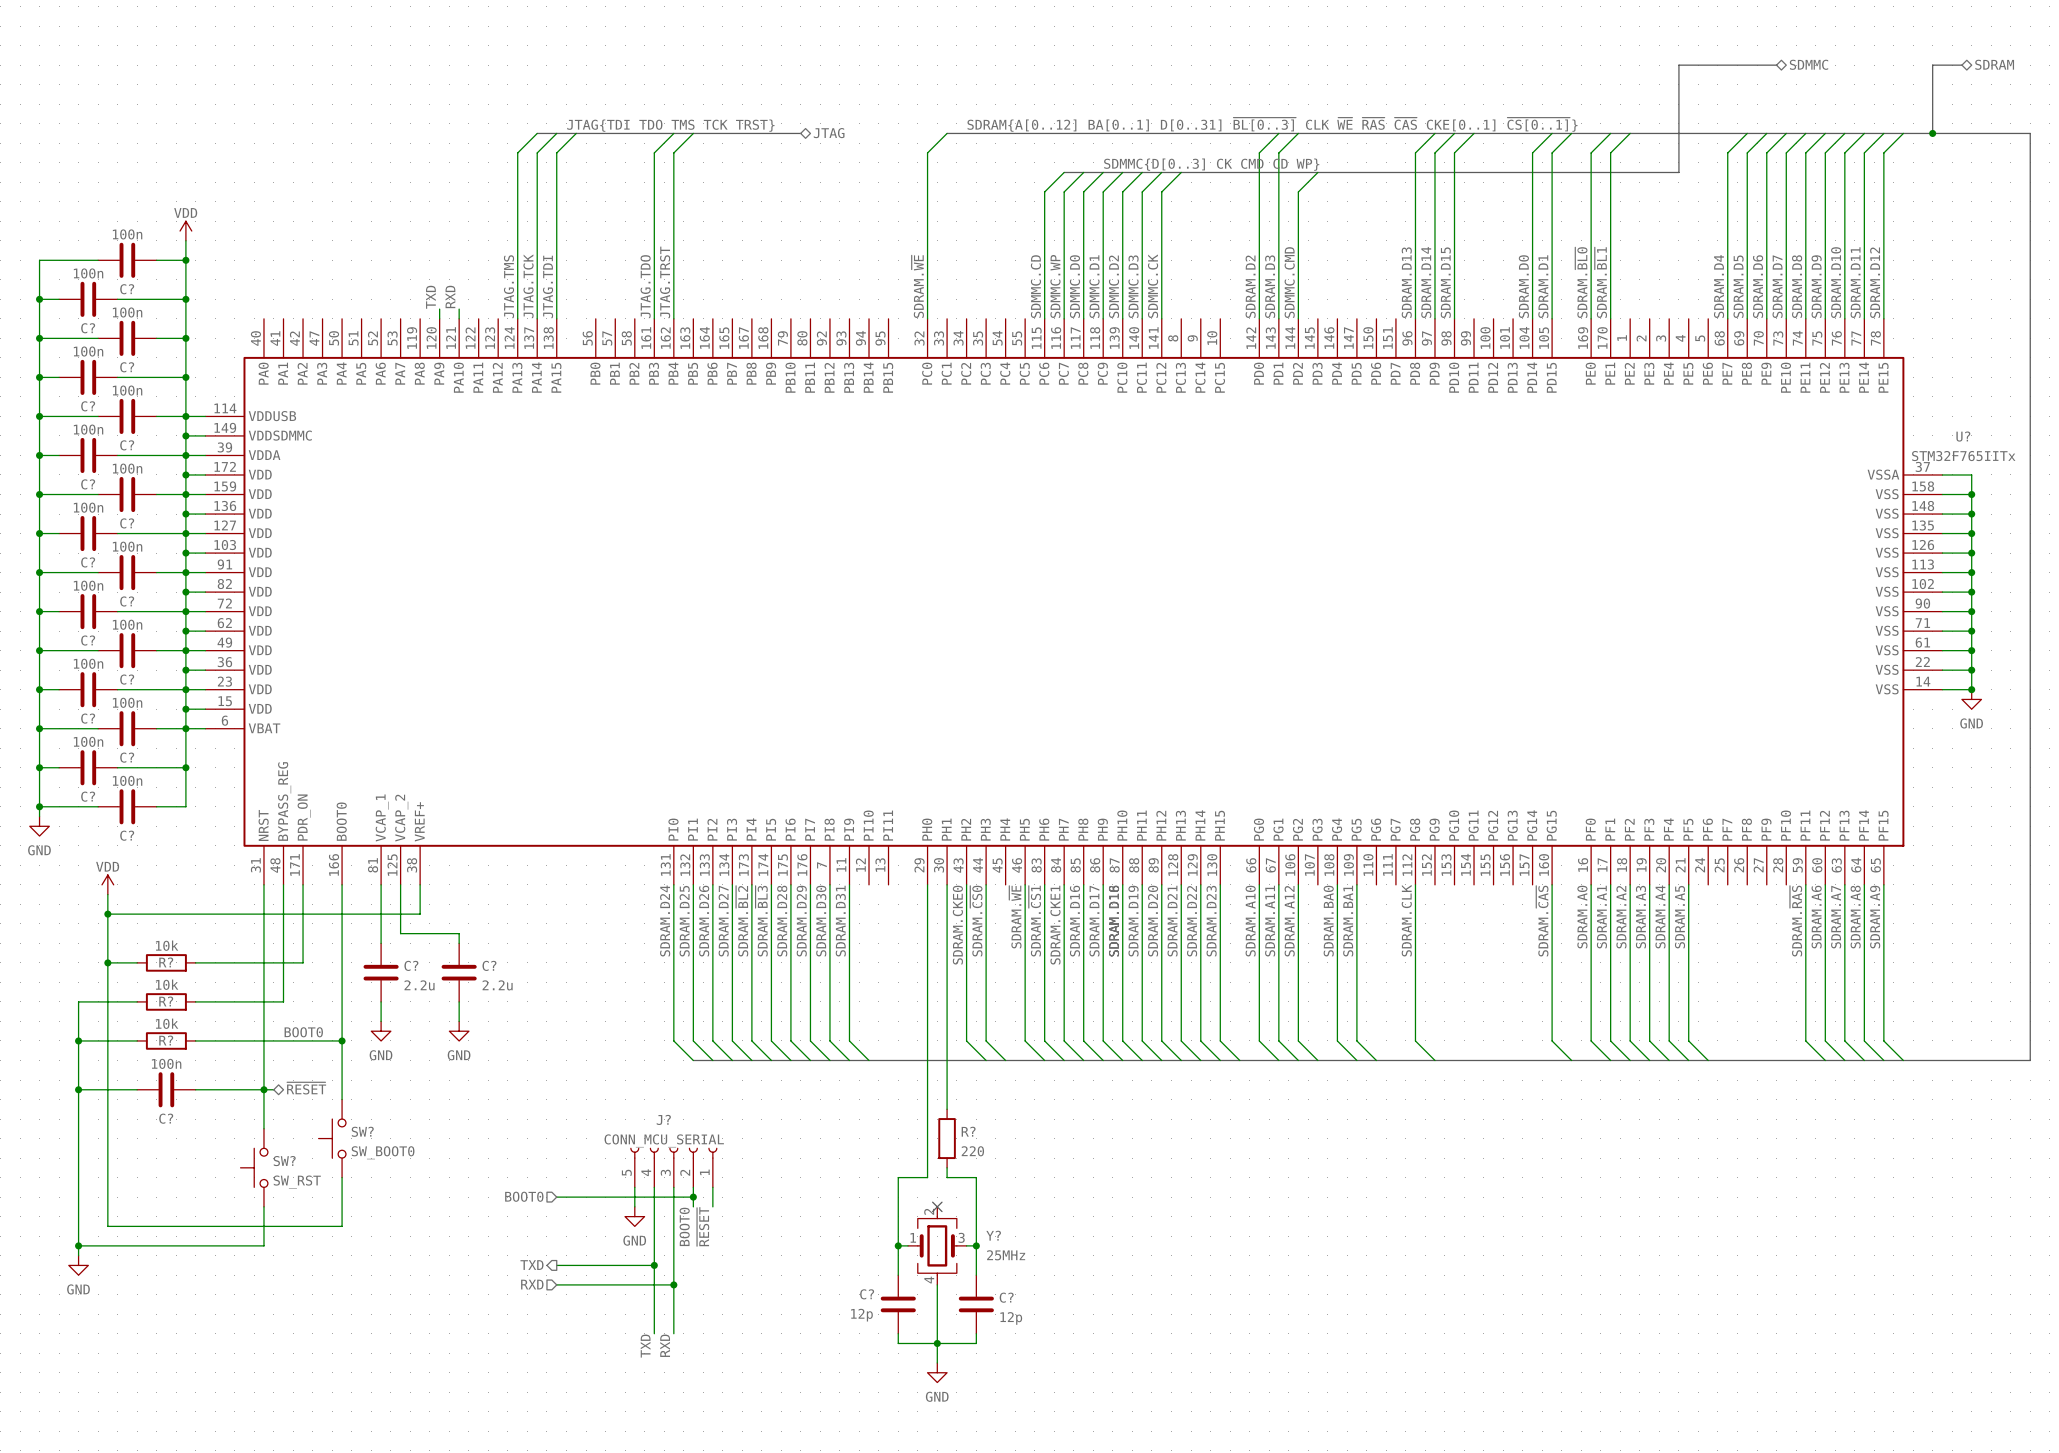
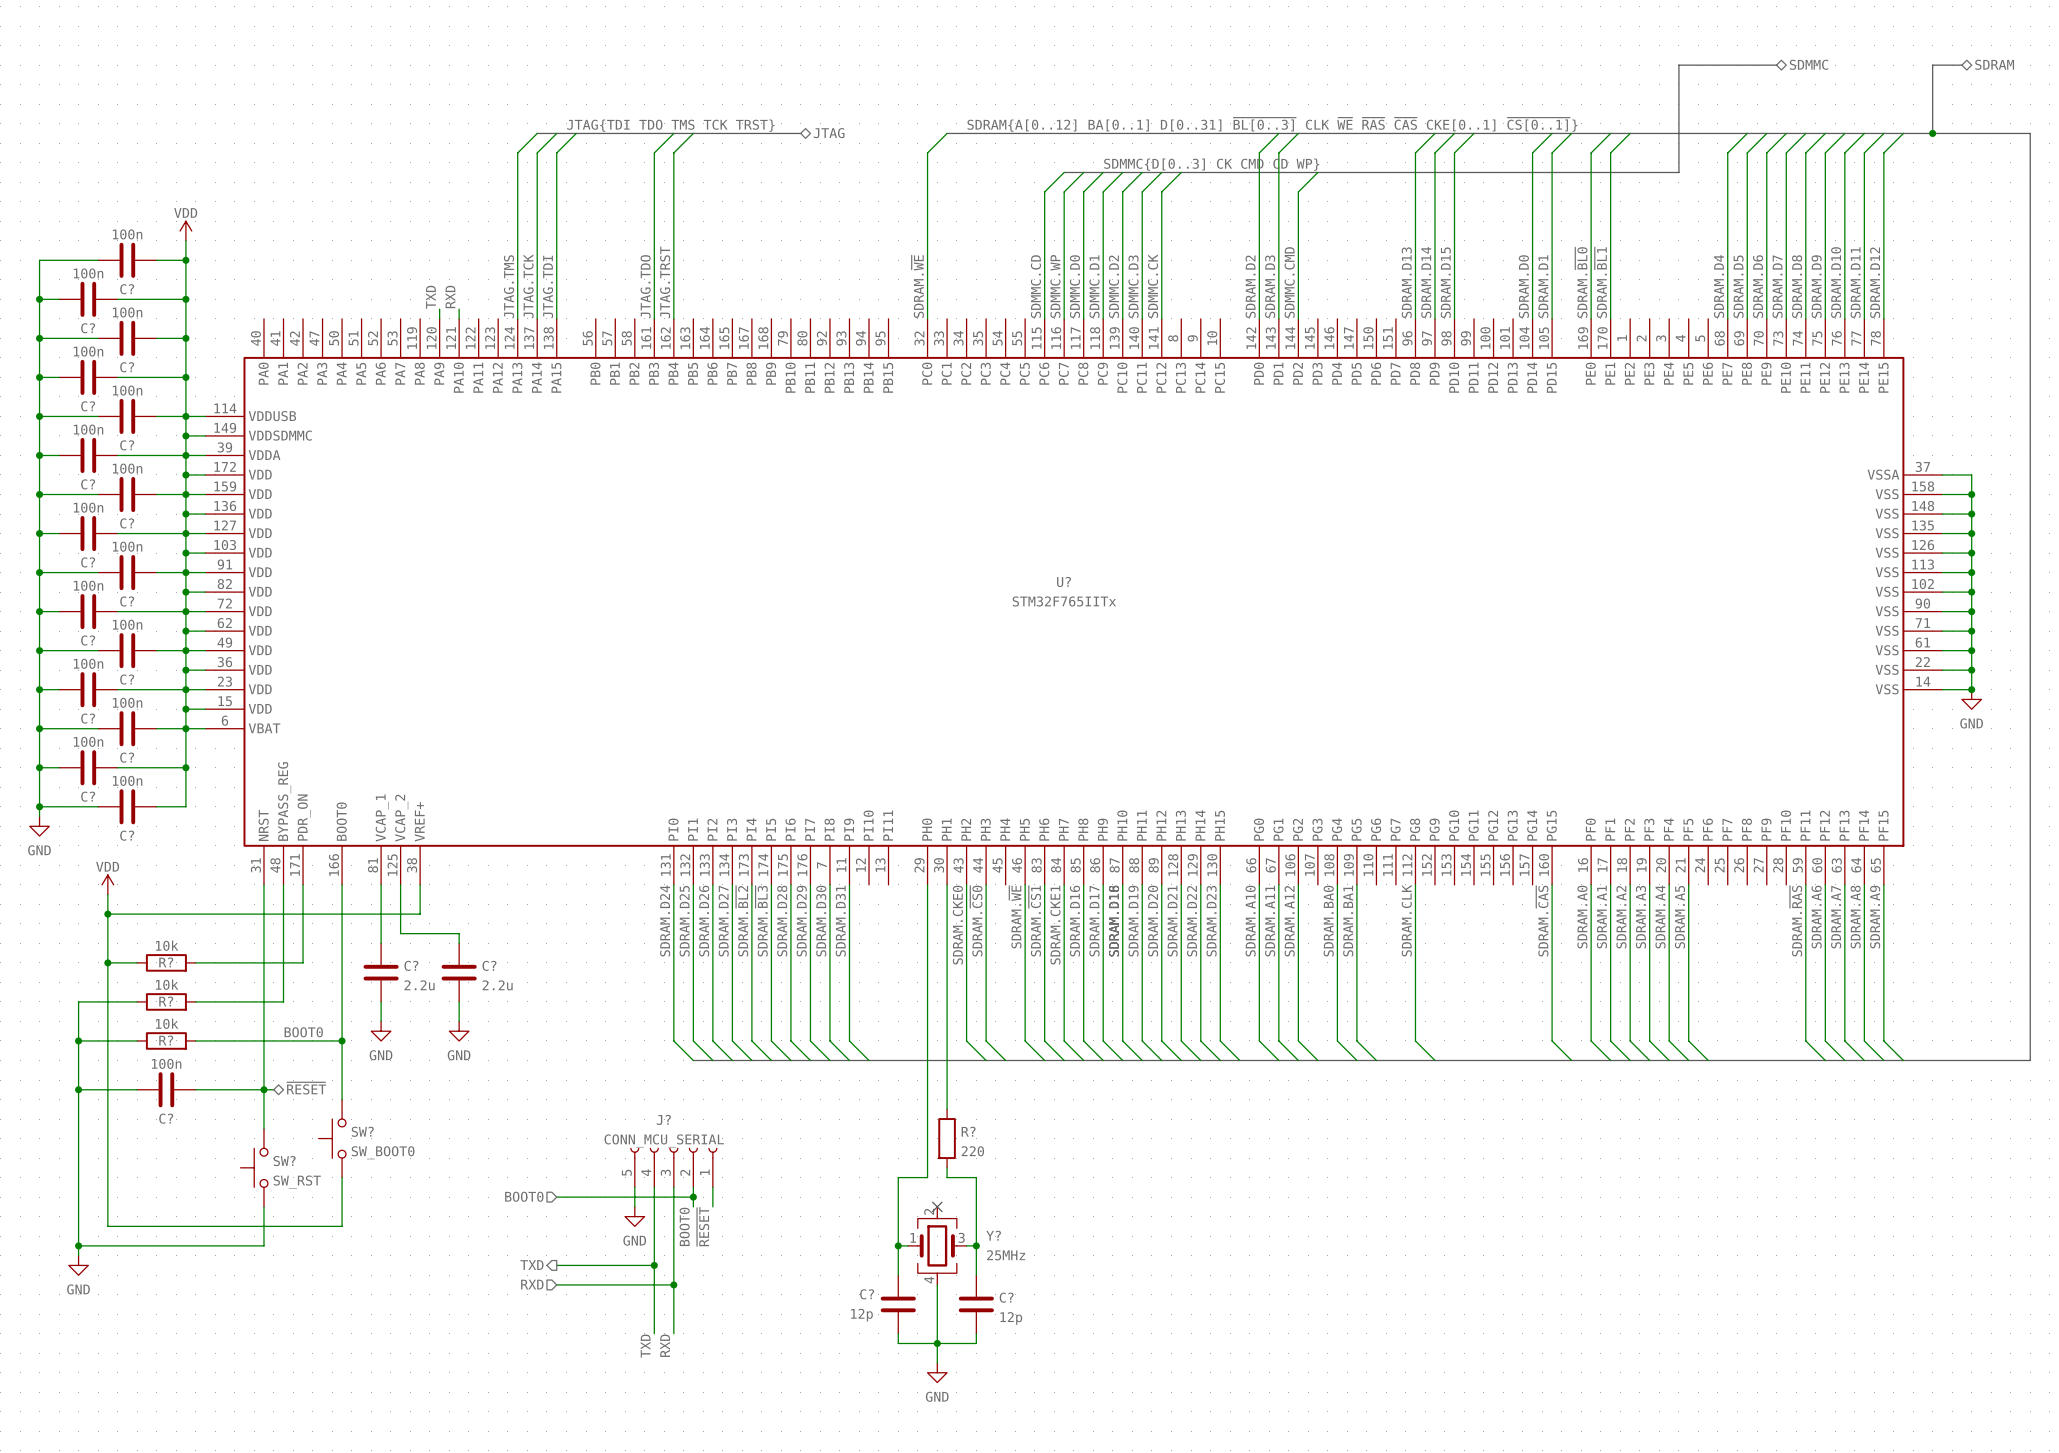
U? name position: U? (1963, 436) -> U? (1064, 581)
U? value position: STM32F765IITx (1963, 456) -> STM32F765IITx (1064, 601)

